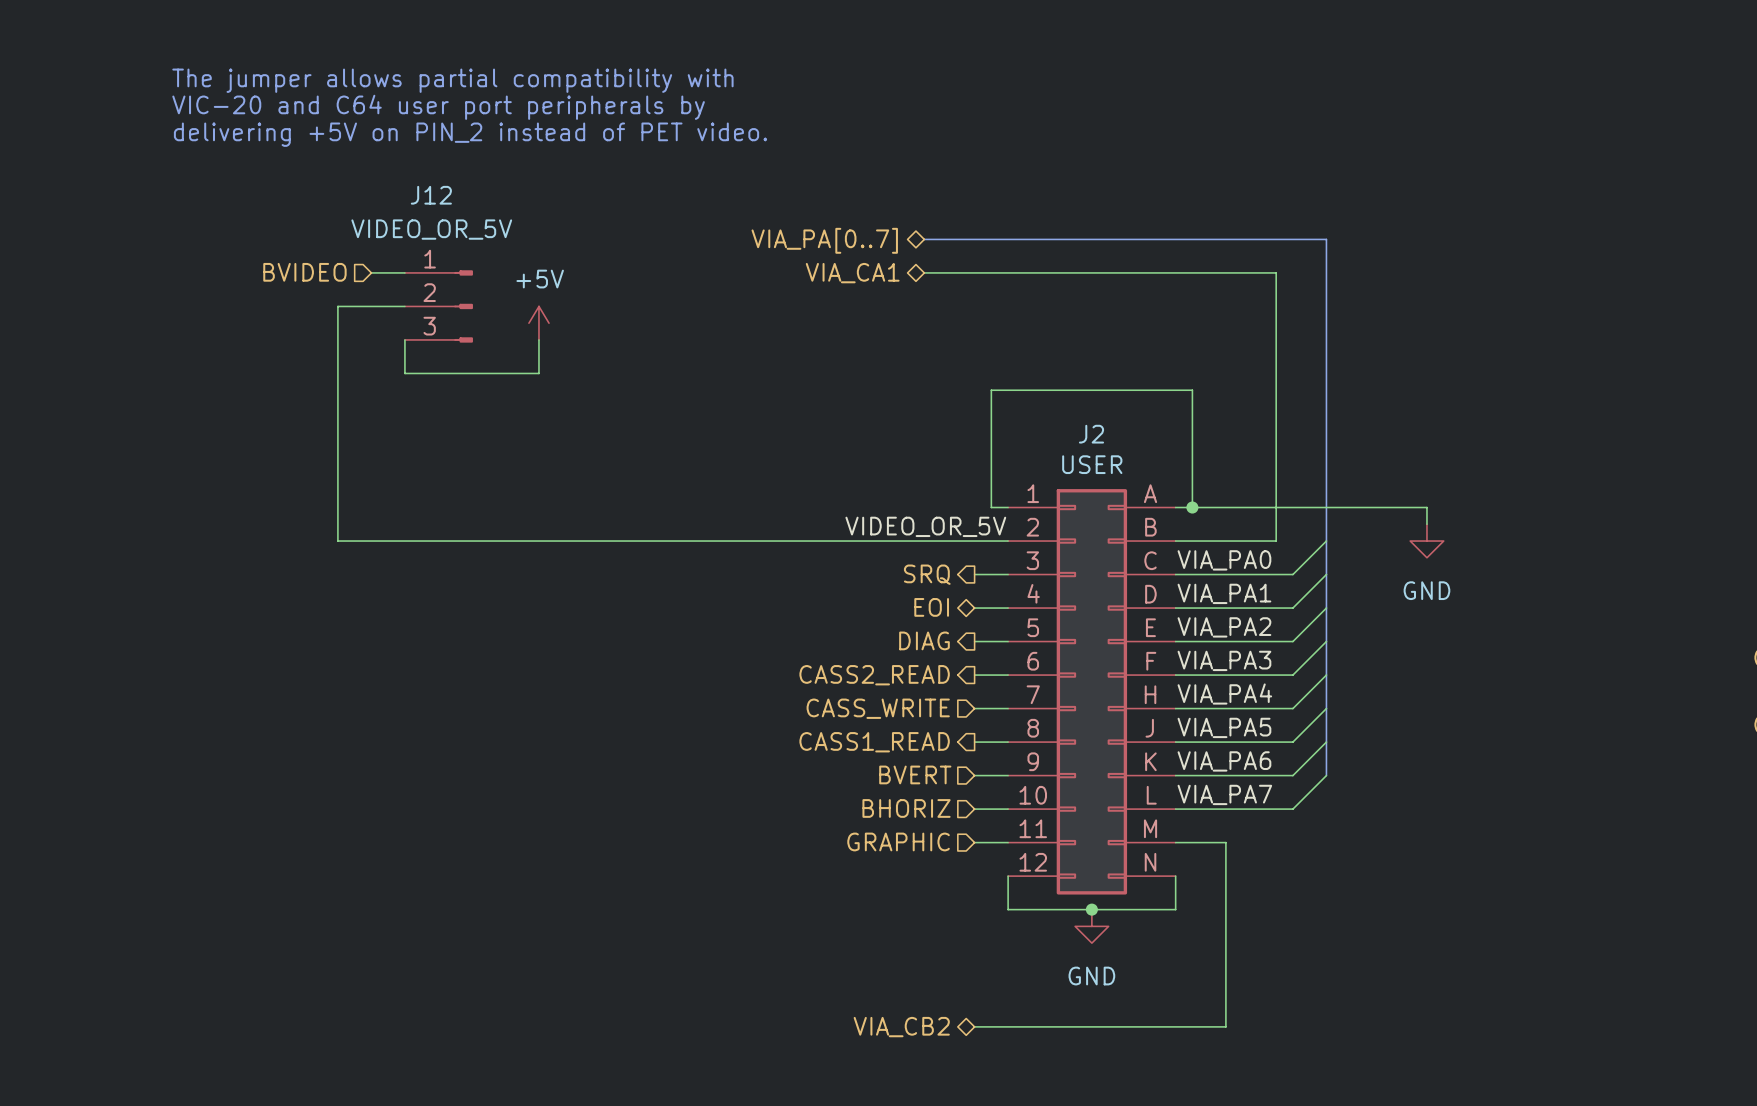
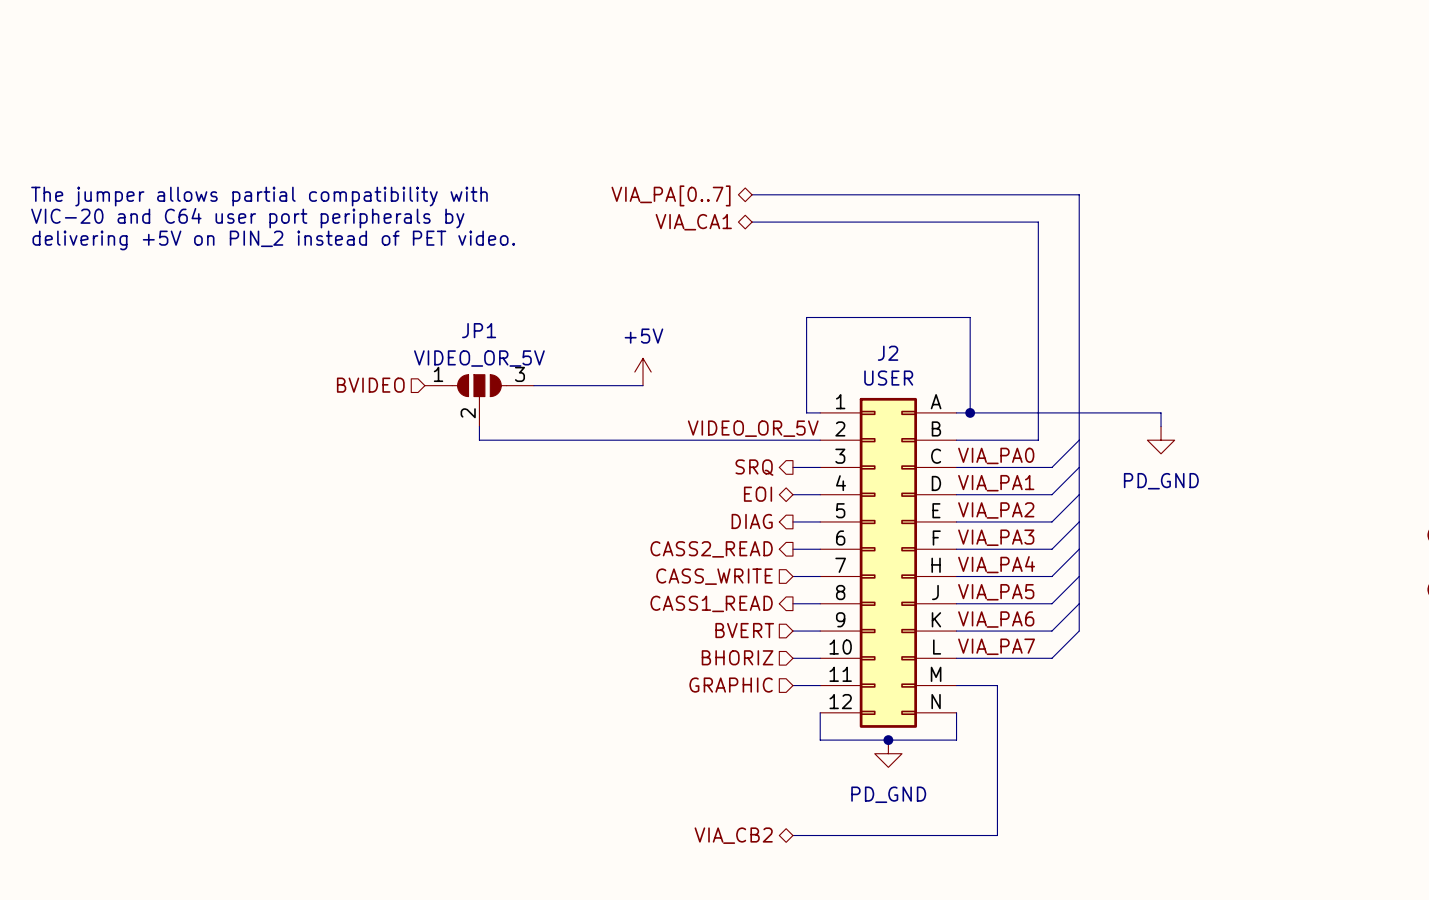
text position: The jumper allows partial compatibility with (452, 80) -> The jumper allows partial compatibility with (259, 196)
text position: VIC-20 and C64 user port peripherals by (438, 107) -> VIC-20 and C64 user port peripherals by (247, 218)
text position: delivering +5V on PIN_2 instead of PET video. (470, 134) -> delivering +5V on PIN_2 instead of PET video. (273, 240)
hierarchical label position: BVIDEO (304, 272) -> BVIDEO (370, 385)
wire: (371, 272) (404, 272) -> none
wire: (404, 306) (337, 306) (337, 541) (589, 541) -> (479, 426) (479, 440)
J12: VIDEO_OR_5V (438, 306) -> none
power symbol position: +5V (538, 323) -> +5V (643, 372)
wire: (404, 339) (404, 373) (538, 373) (538, 339) -> none
wire: none -> (533, 385) (643, 385)
JP1: none -> VIDEO_OR_5V (479, 400)
power symbol: GND (1426, 541) -> PD_GND (1161, 440)
power symbol: GND (1091, 926) -> PD_GND (888, 753)

